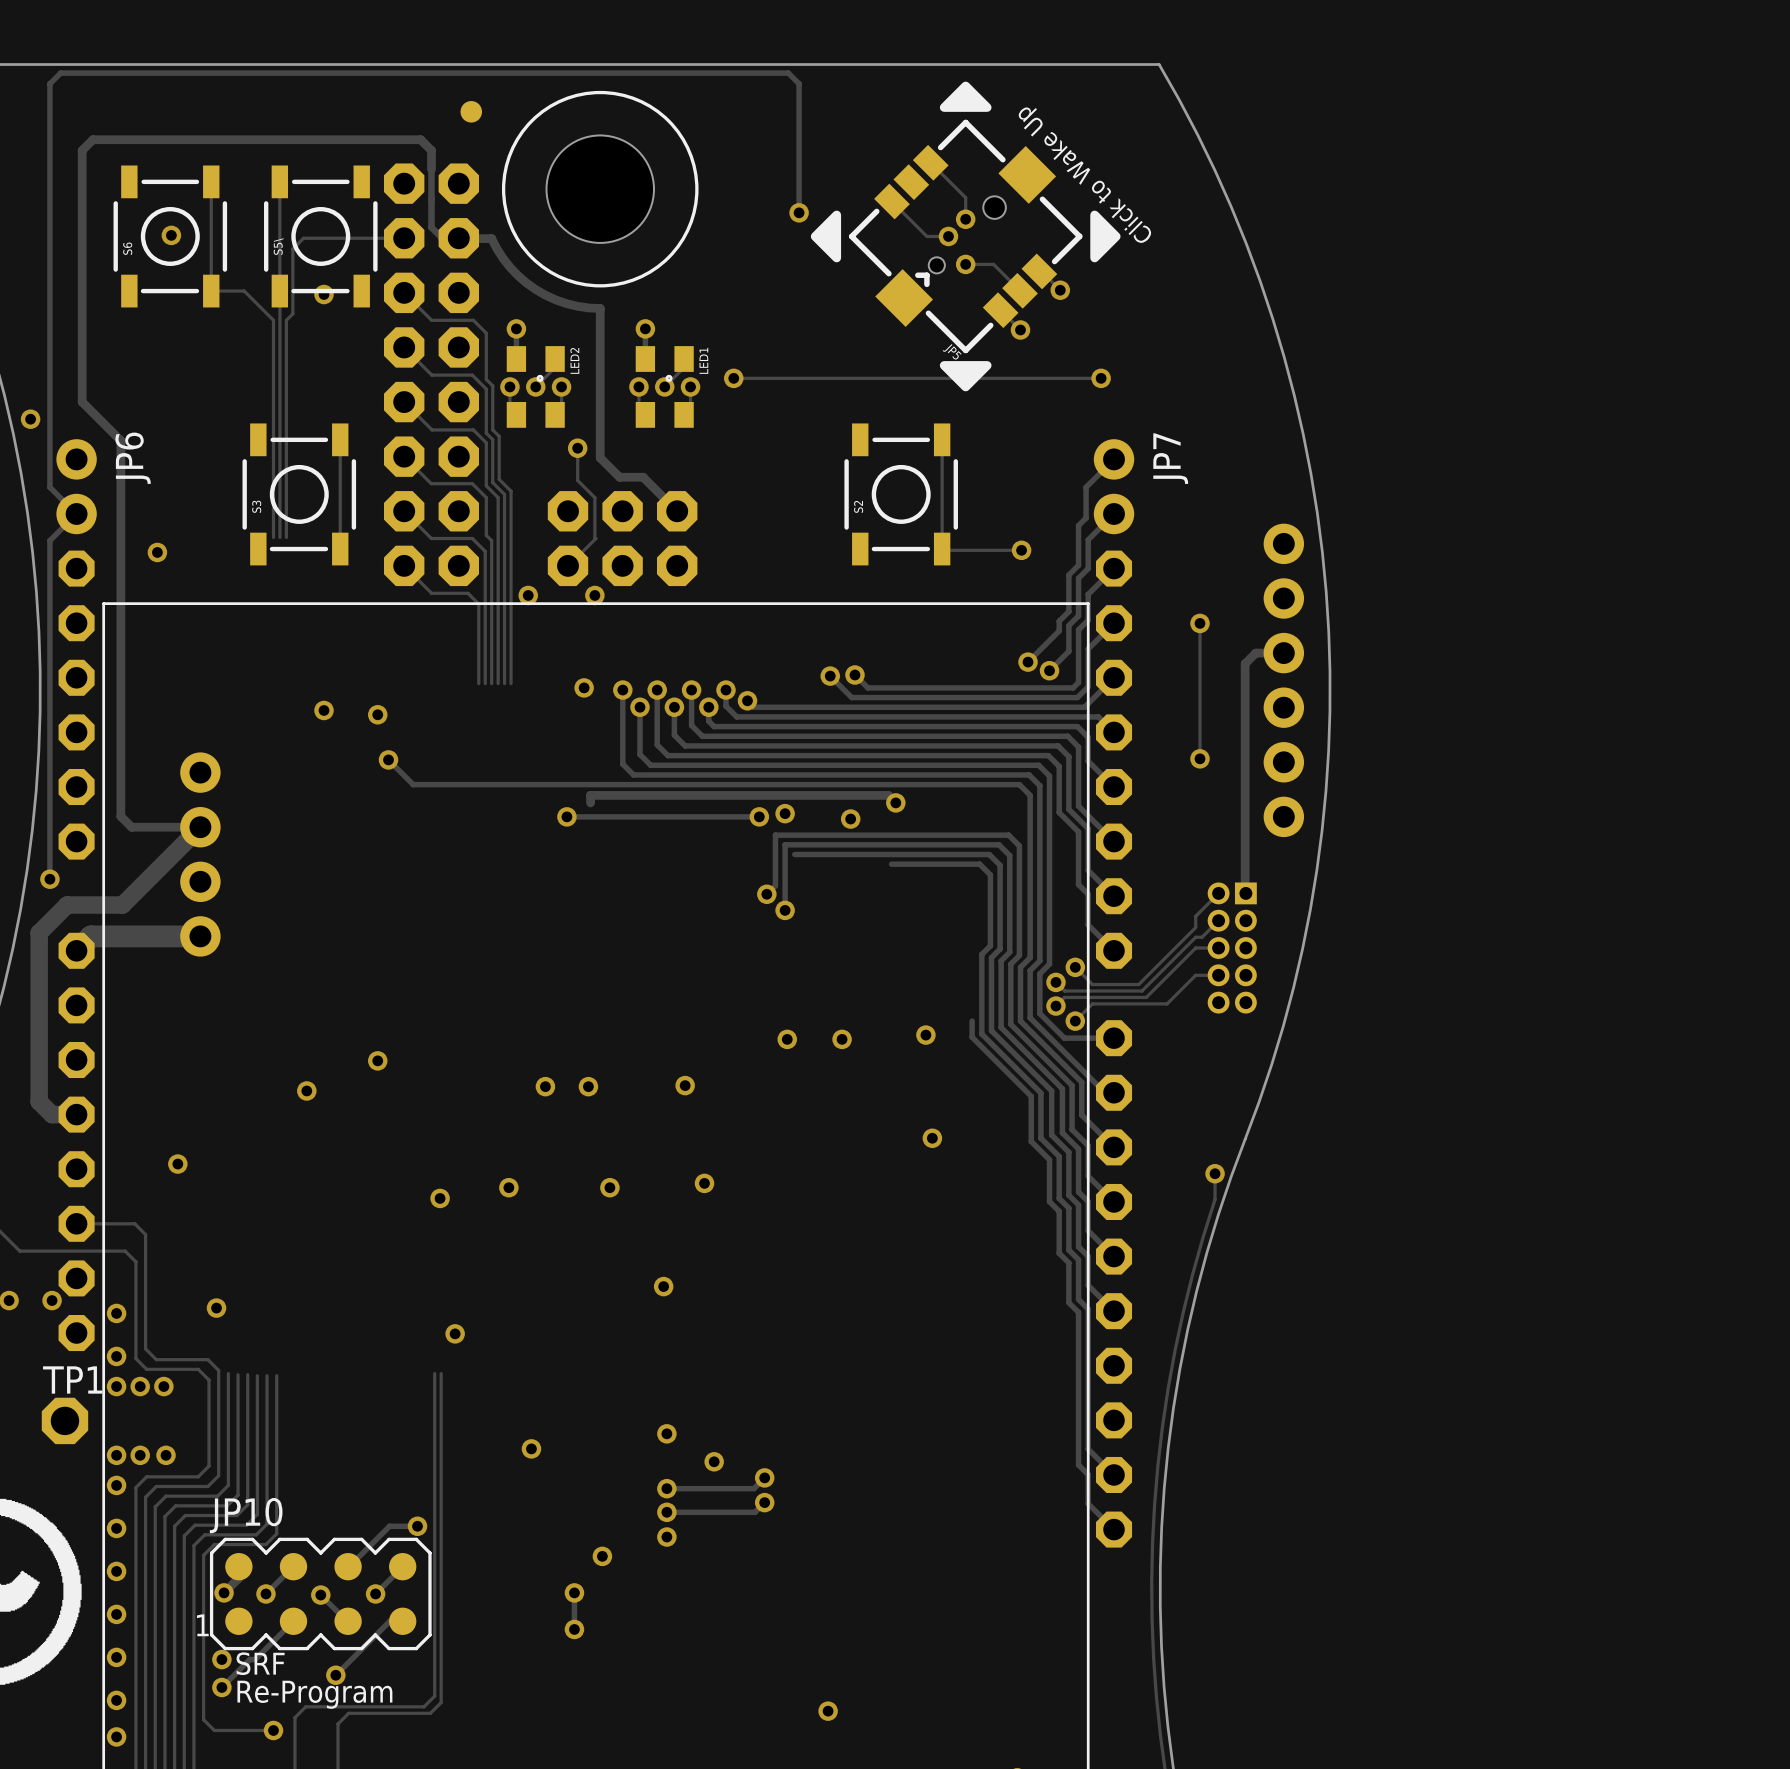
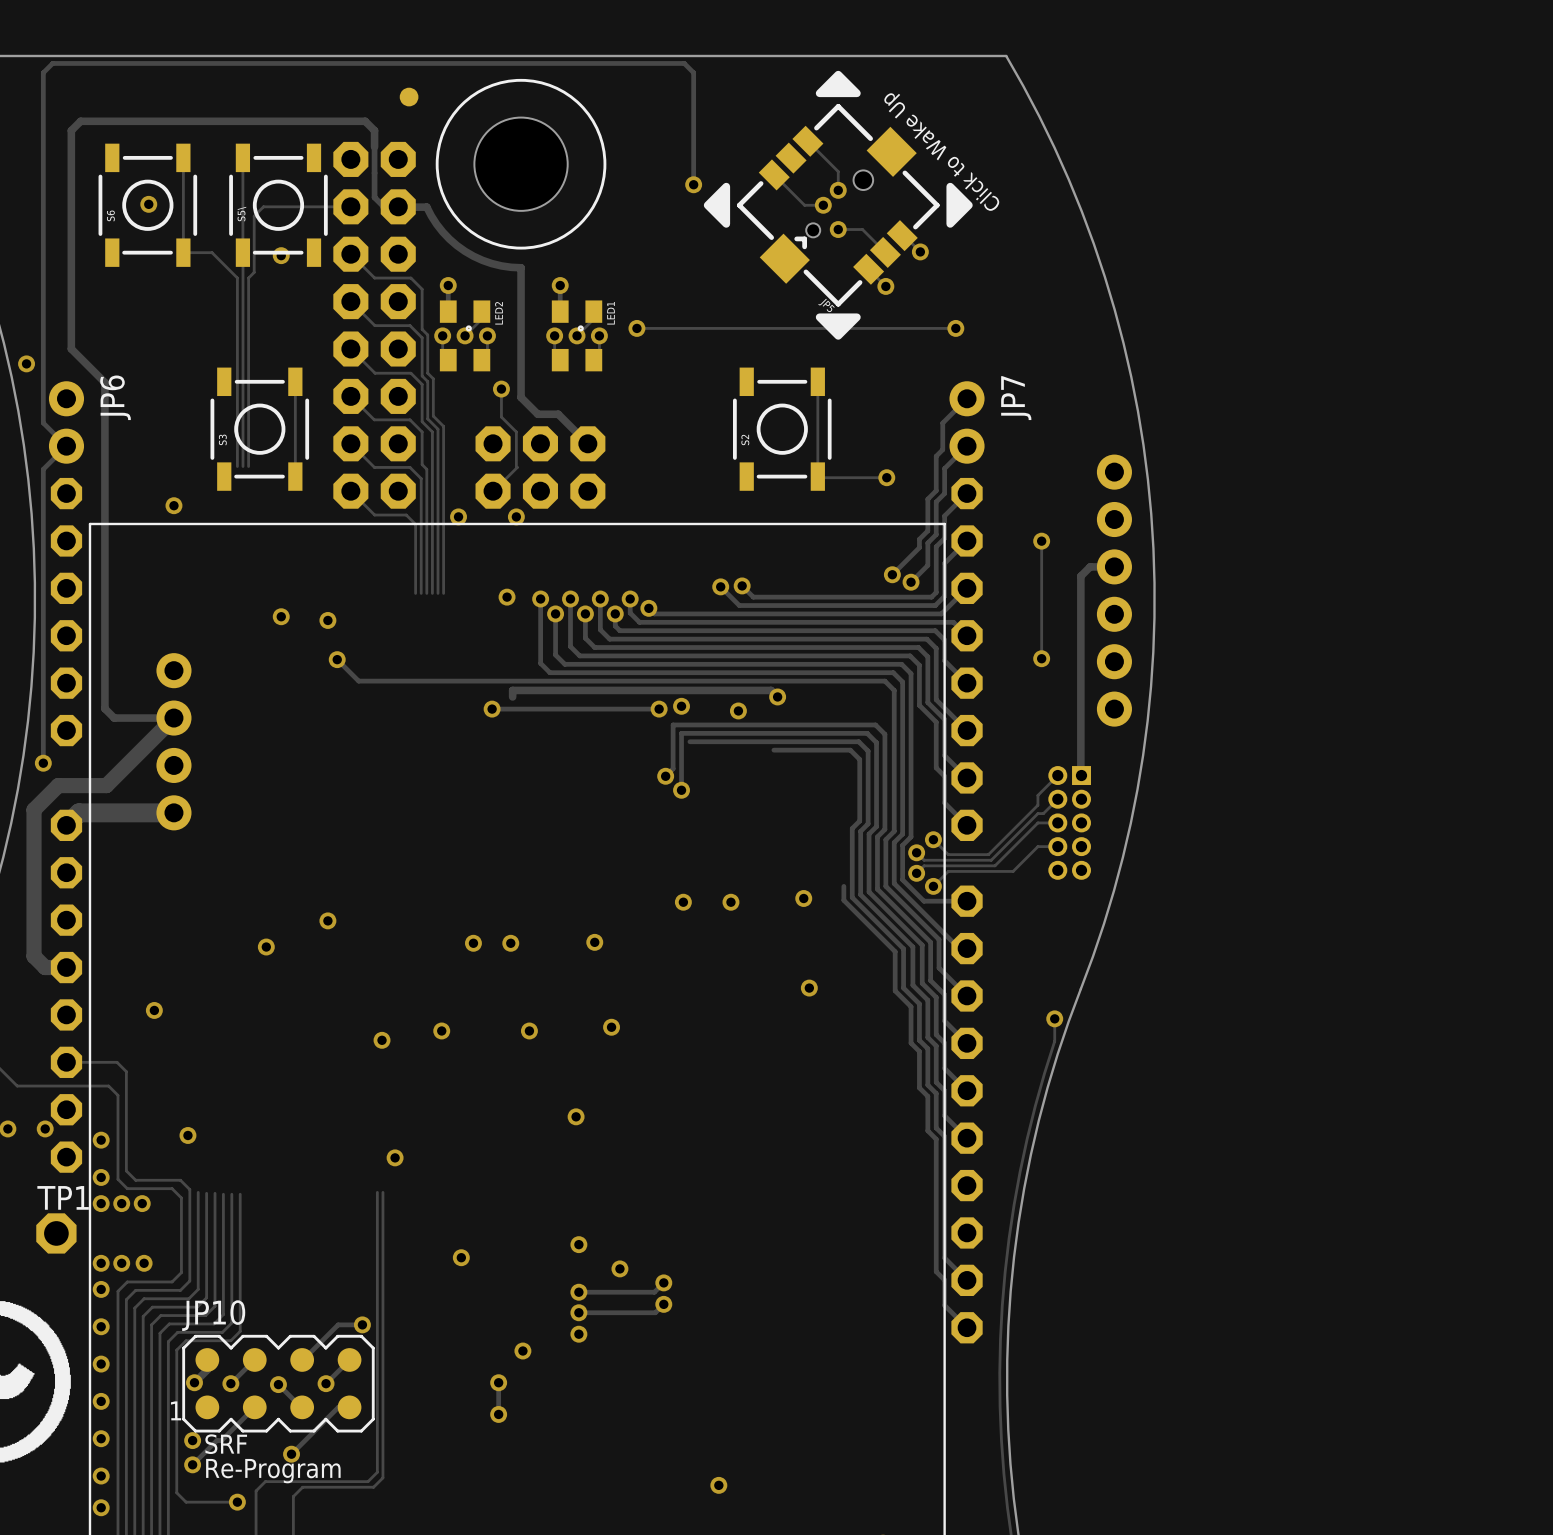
via position: (157, 552) -> (173, 505)

